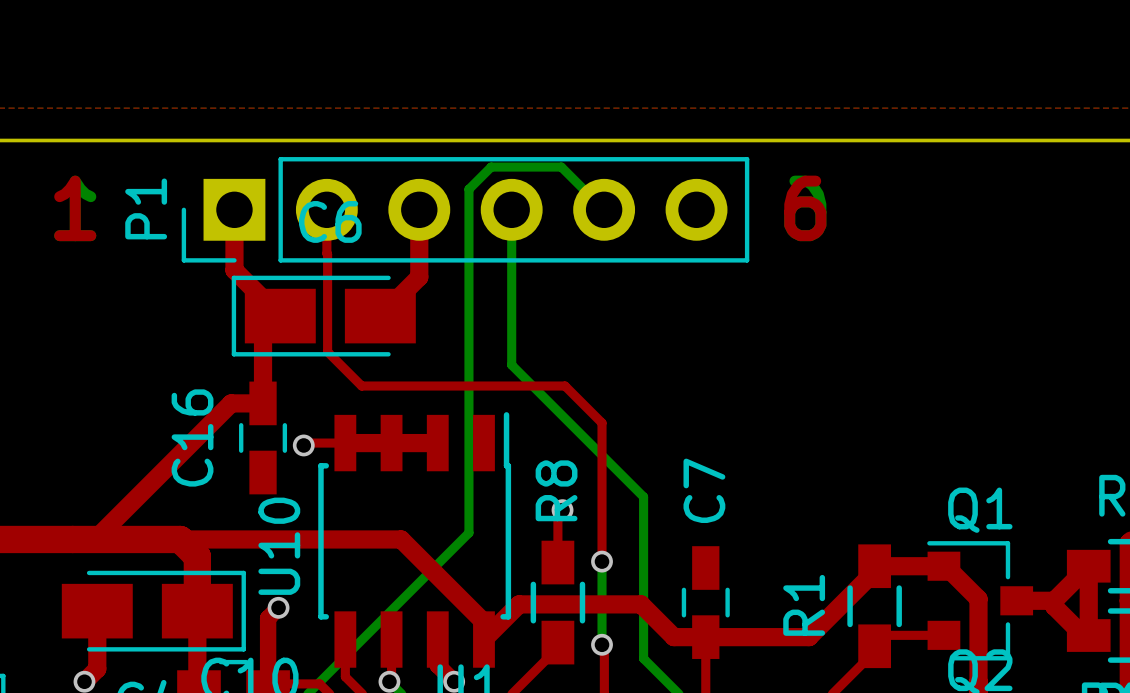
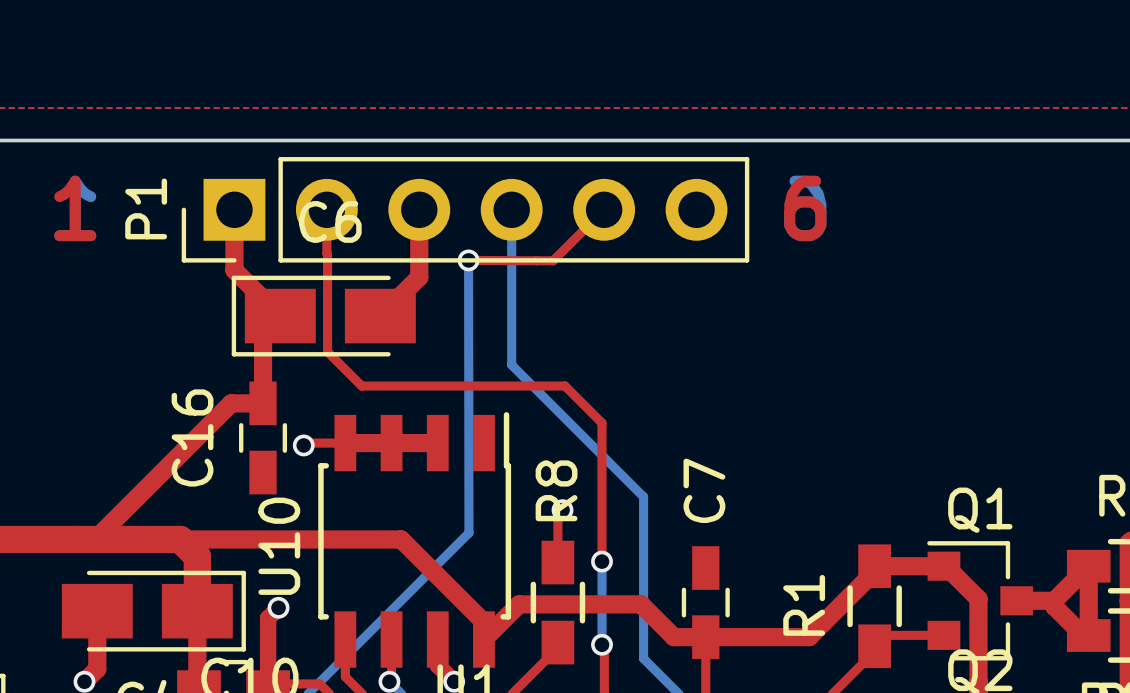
top track: none -> (604, 209) (553, 260) (468, 260)
bottom track: (604, 209) (561, 167) (491, 167) (468, 189) (468, 532) -> (468, 260) (468, 532)
via: none -> (468, 260)

